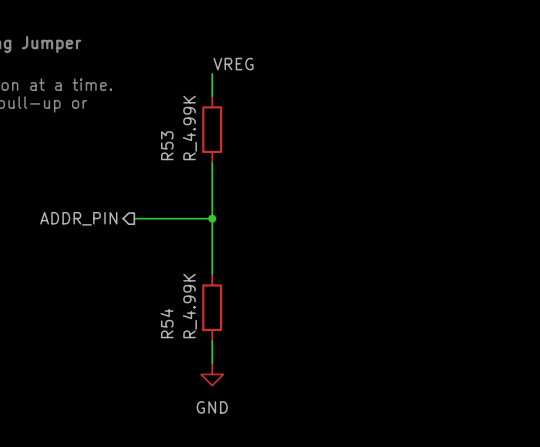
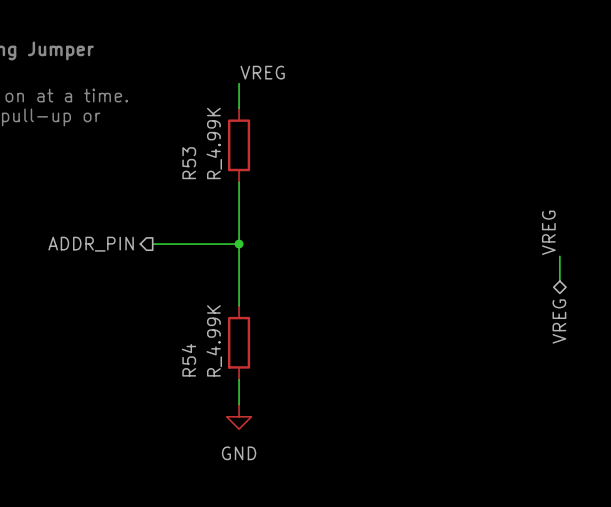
label: none -> VREG (548, 232)
wire: none -> (559, 256) (559, 281)
hierarchical label: none -> VREG (559, 321)

